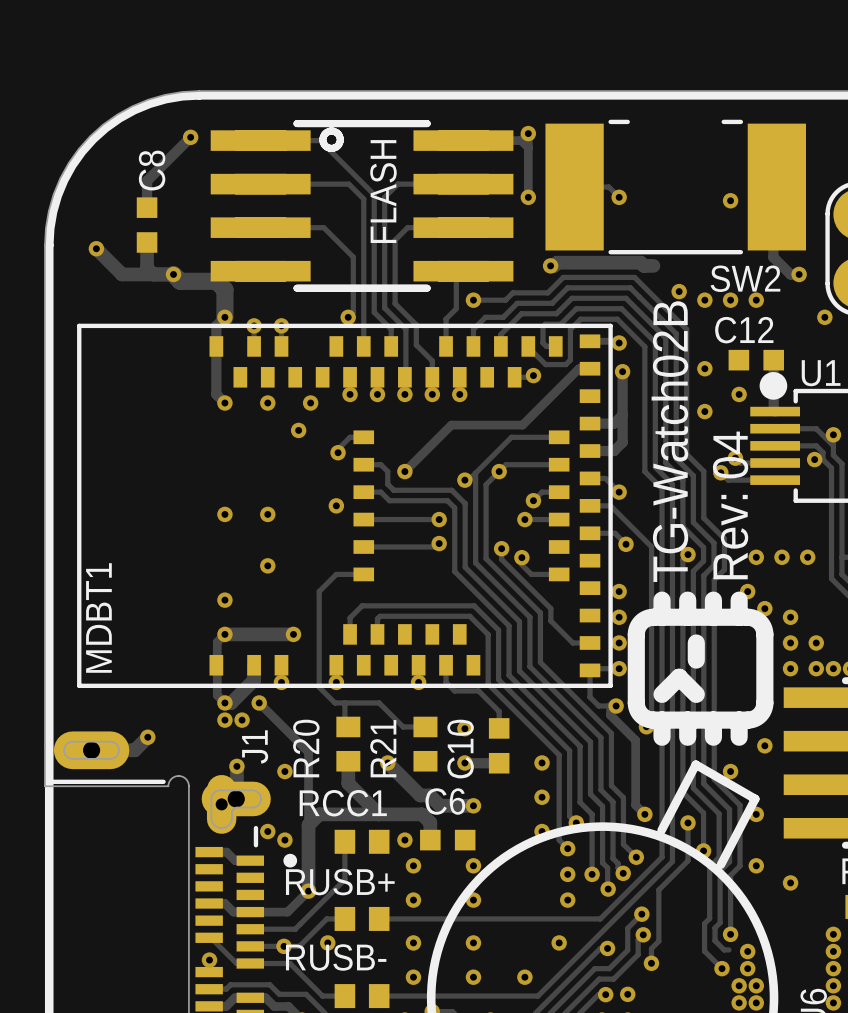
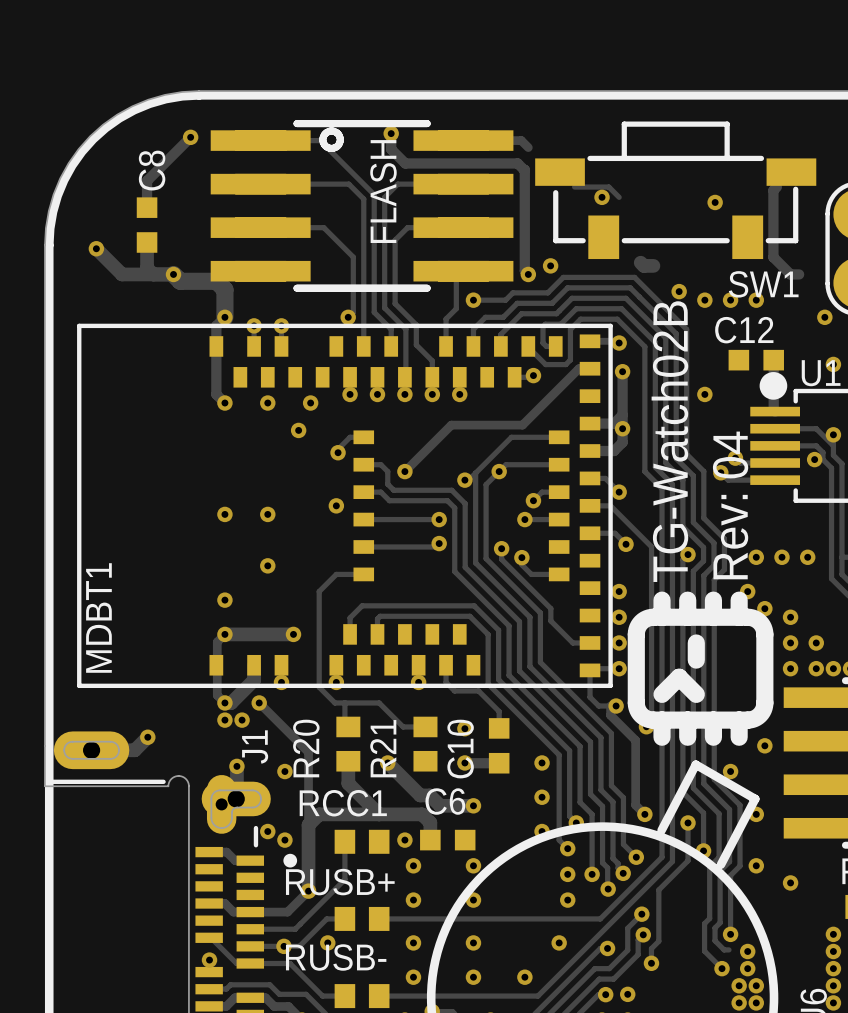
track: none -> (391, 133) (391, 149) (405, 163) (517, 163) (524, 169) (524, 270) (528, 274)
via: none -> (391, 133)
via: (528, 133) -> none
track: (521, 140) (528, 133) (528, 197) -> none
SW2: (675, 187) -> none
SW1: none -> (675, 190)
via: (528, 197) -> none
via position: (619, 197) -> (602, 197)
via position: (730, 200) -> (715, 202)
track: (640, 262) (557, 262) (550, 265) -> none
via: none -> (528, 274)
via: (799, 274) -> none
via: none -> (833, 364)
via: (704, 368) -> none
via: none -> (704, 394)
via: (739, 394) -> none
via: (704, 411) -> none
via: none -> (622, 428)

